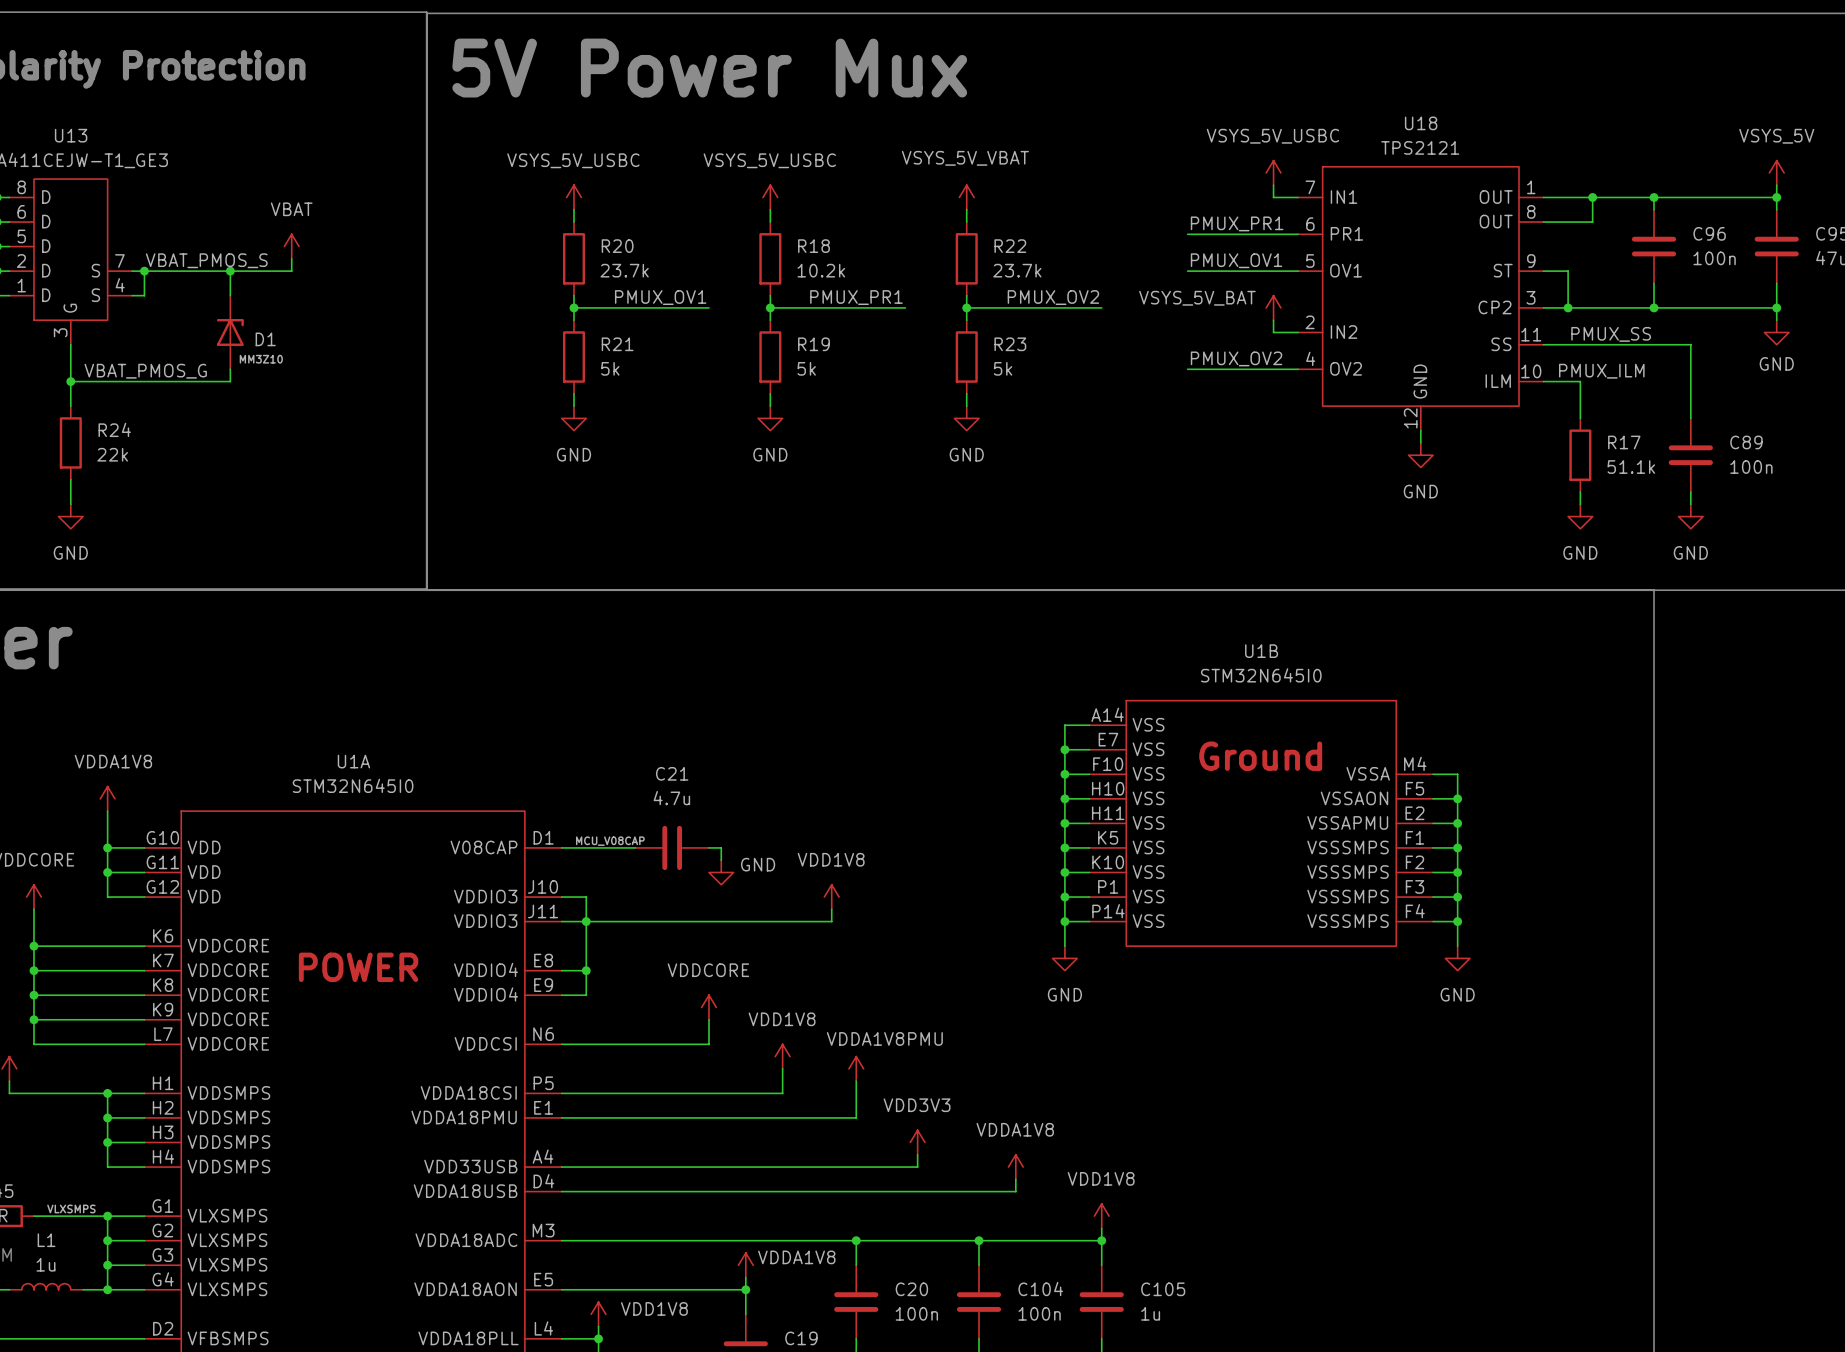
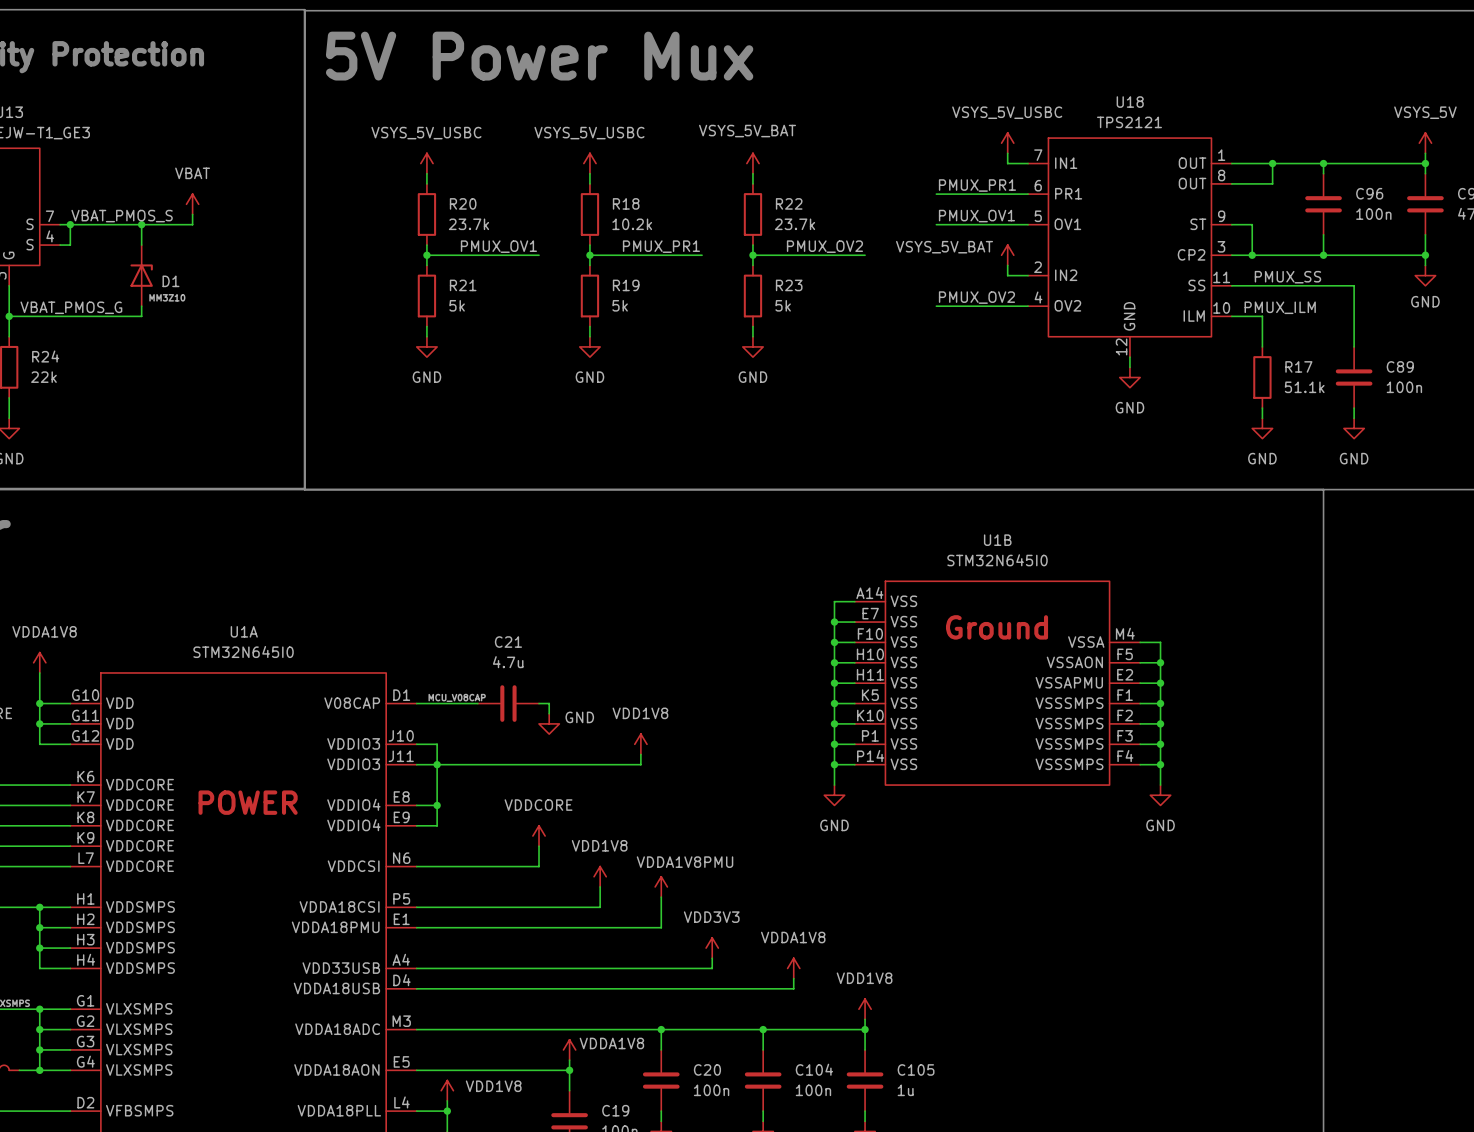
power symbol: VSYS_5V_VBAT (966, 197) -> VSYS_5V_BAT (752, 163)

